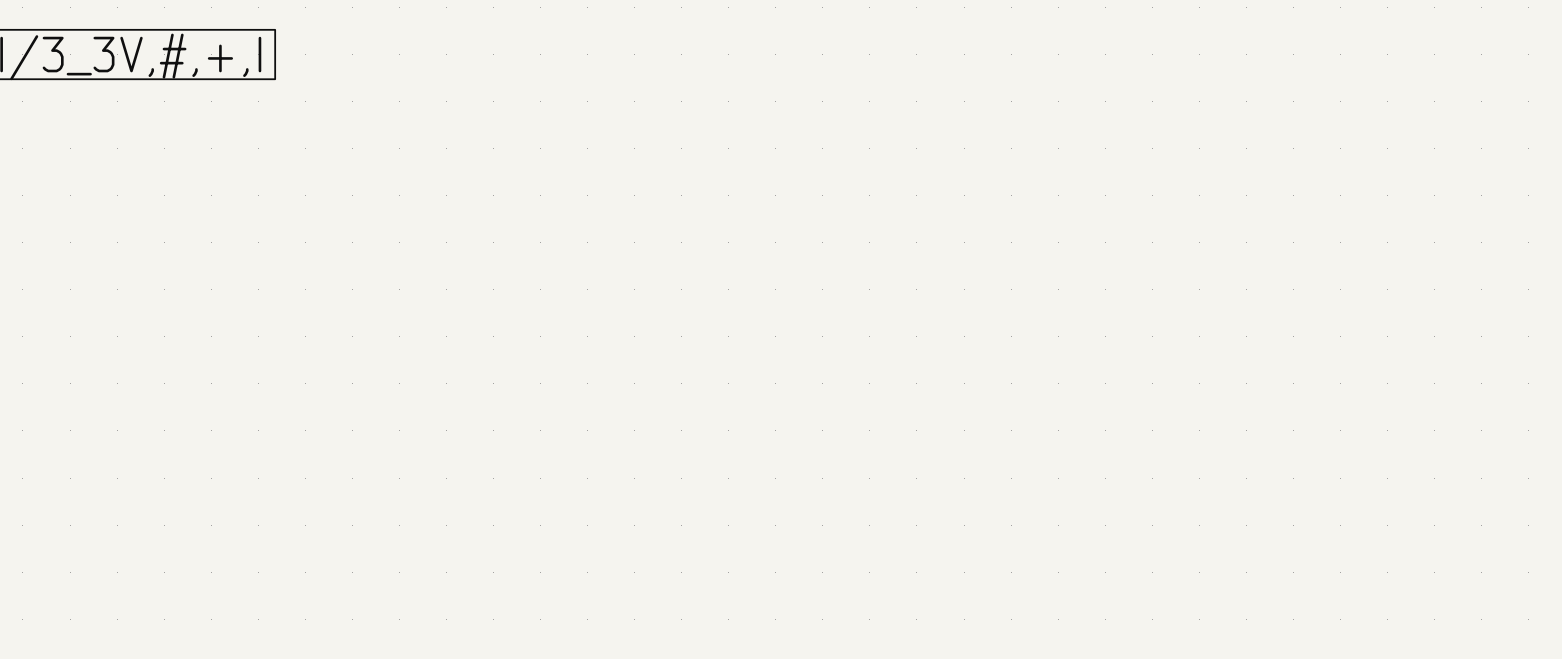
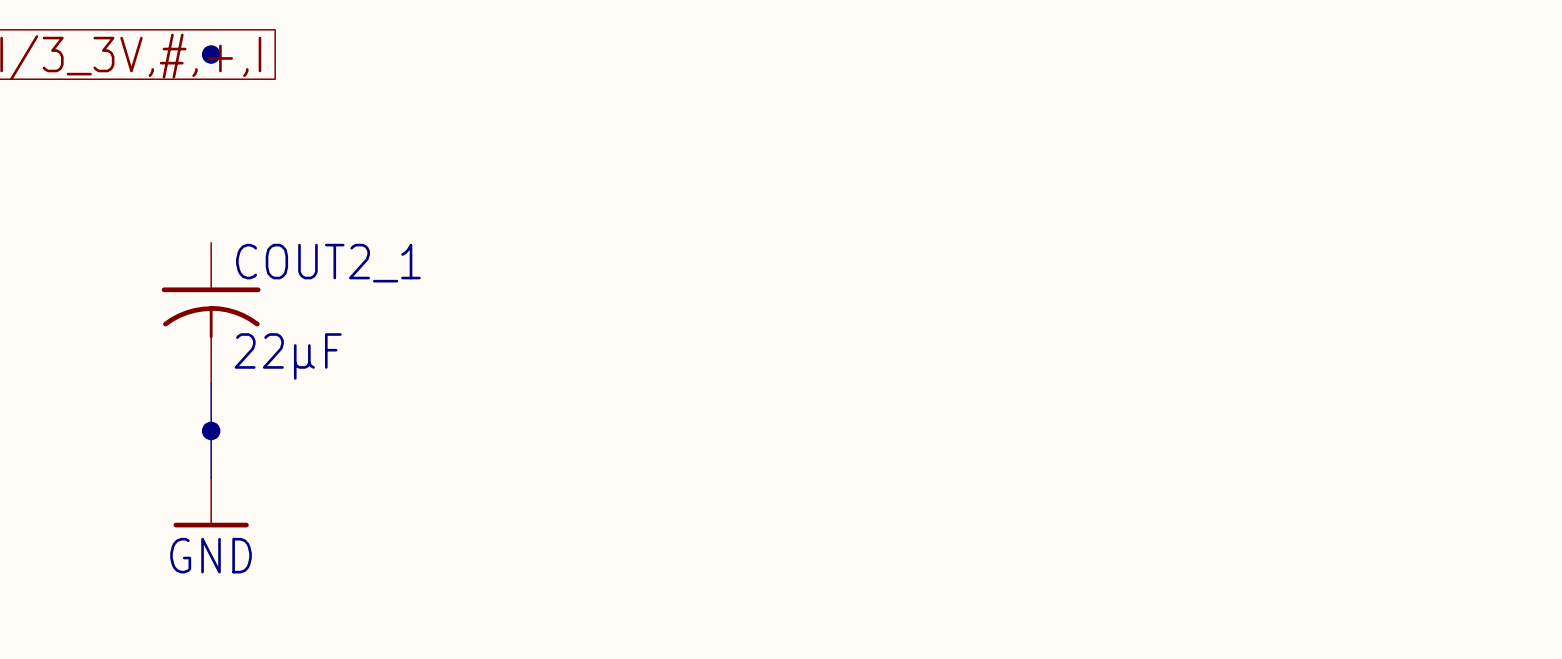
junction: none -> (211, 54)
COUT2_1: none -> 22µF (211, 313)
wire: none -> (211, 383) (211, 478)
junction: none -> (211, 430)
power symbol: none -> GND (211, 502)

